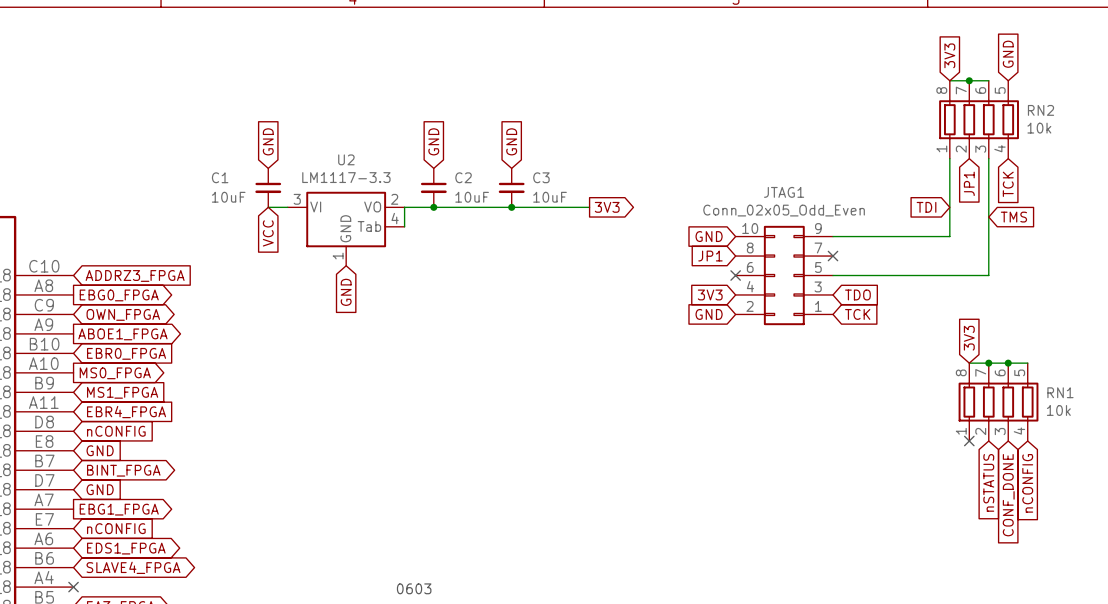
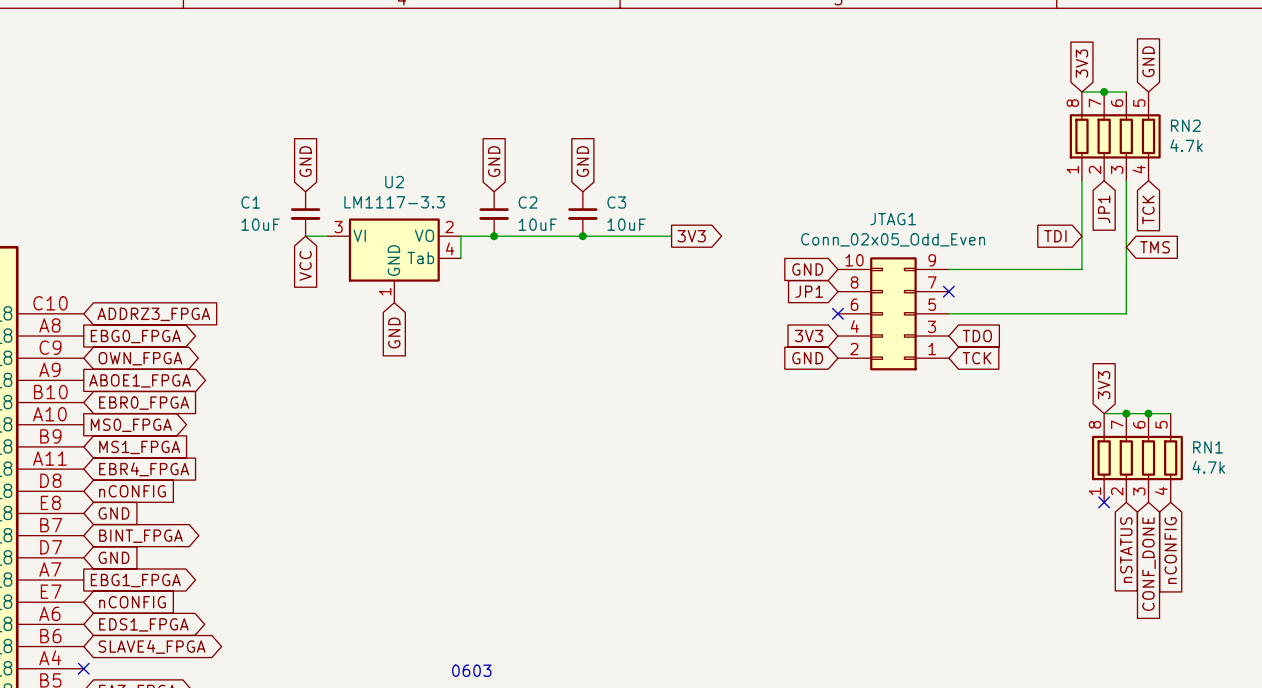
RN2 value: 10k (1039, 128) -> 4.7k (1186, 145)
RN1 value: 10k (1058, 410) -> 4.7k (1208, 467)

